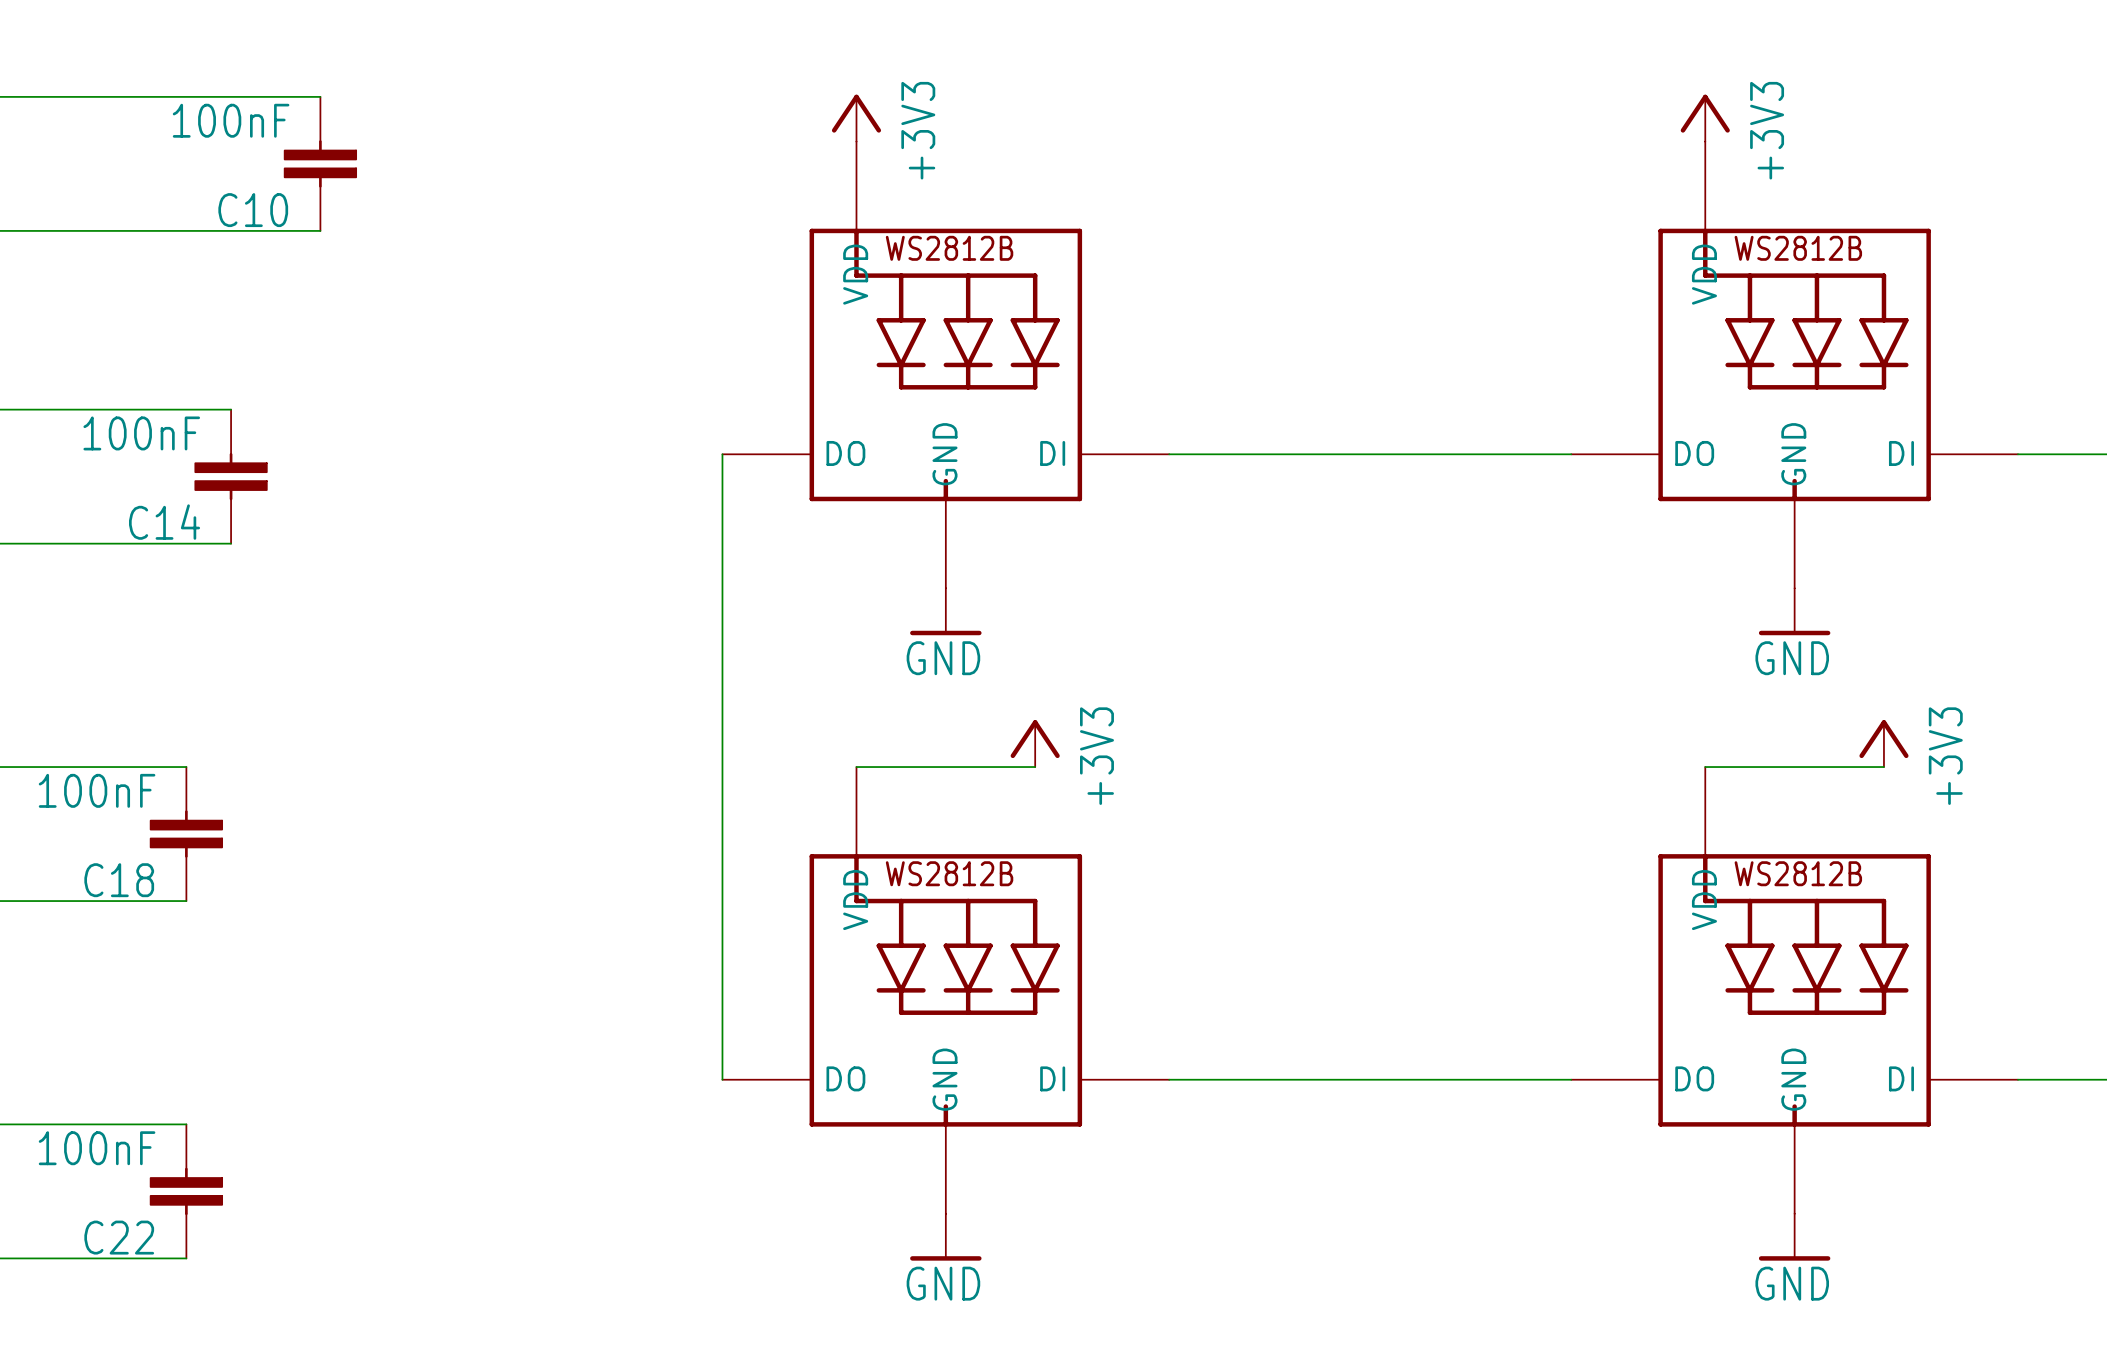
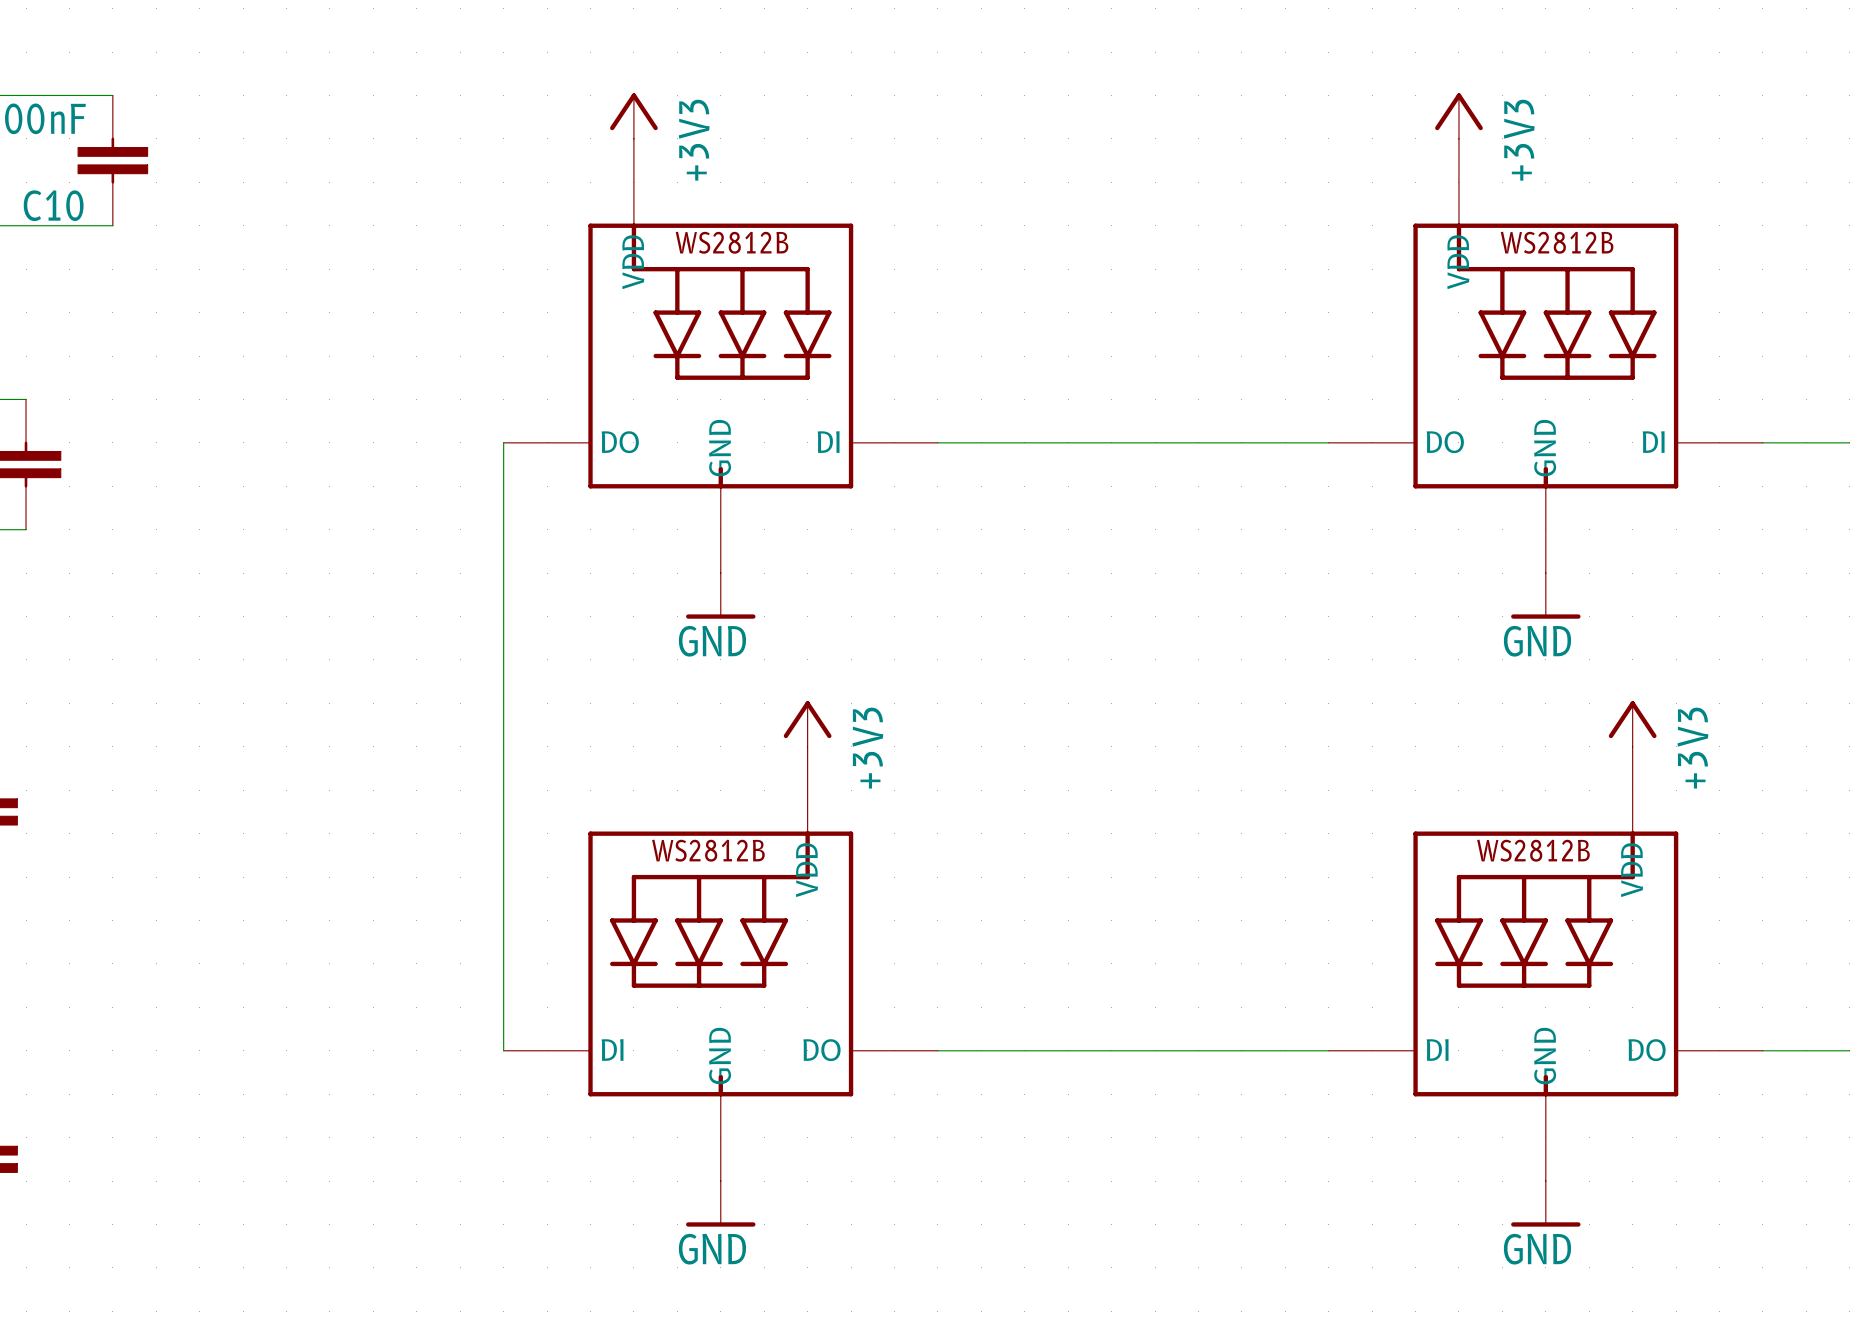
wire: (856, 767) (1035, 767) -> none
wire: (1705, 767) (1883, 767) -> none
part flip: as is (945, 990) -> left-right (720, 963)
part flip: as is (1794, 990) -> left-right (1545, 963)

